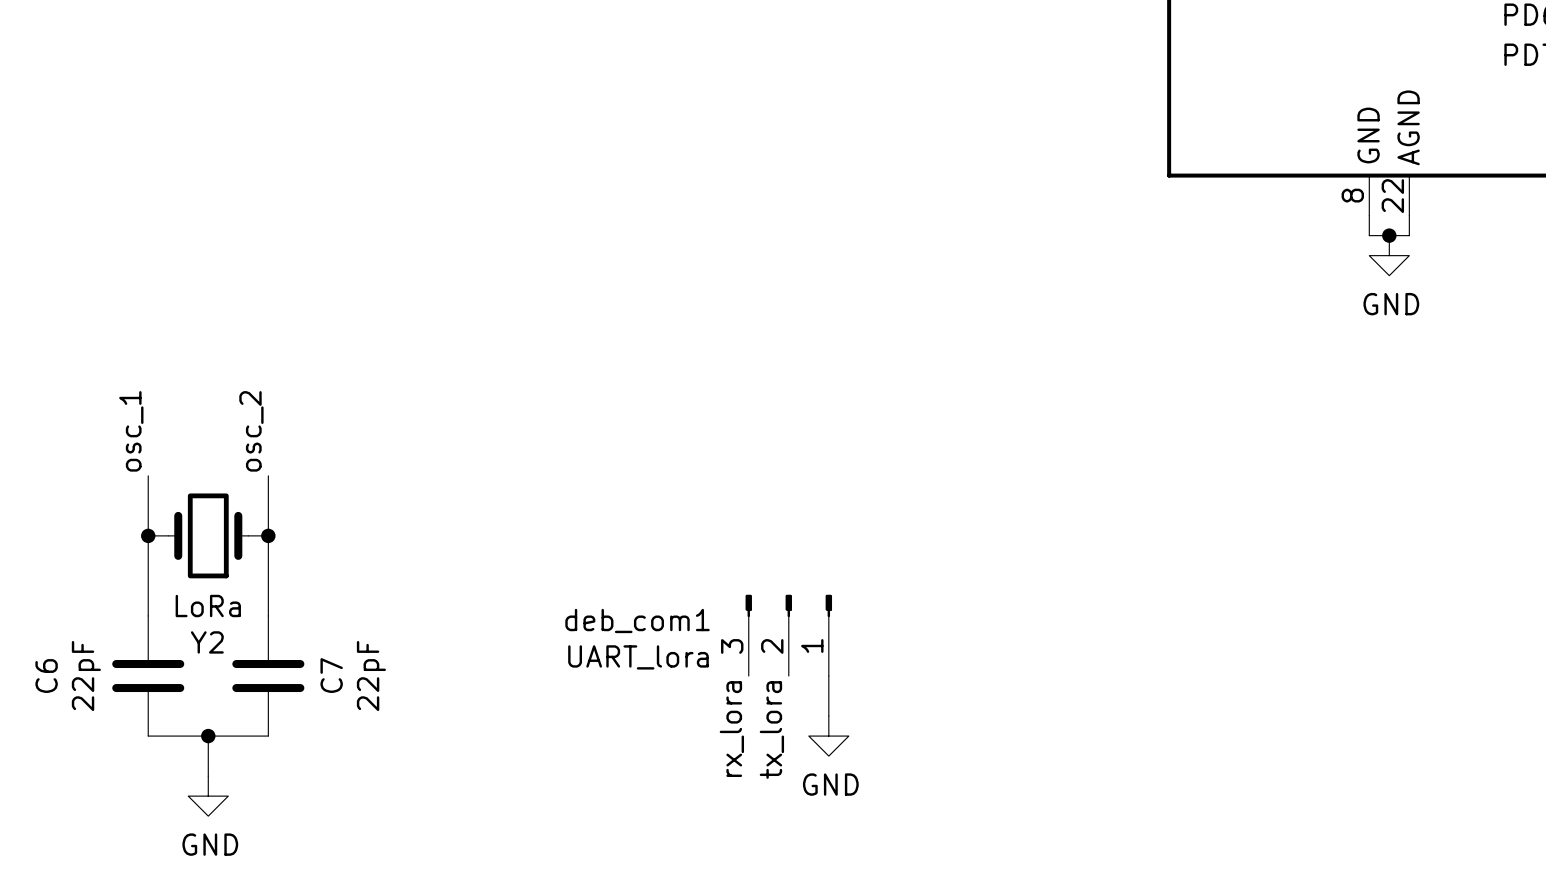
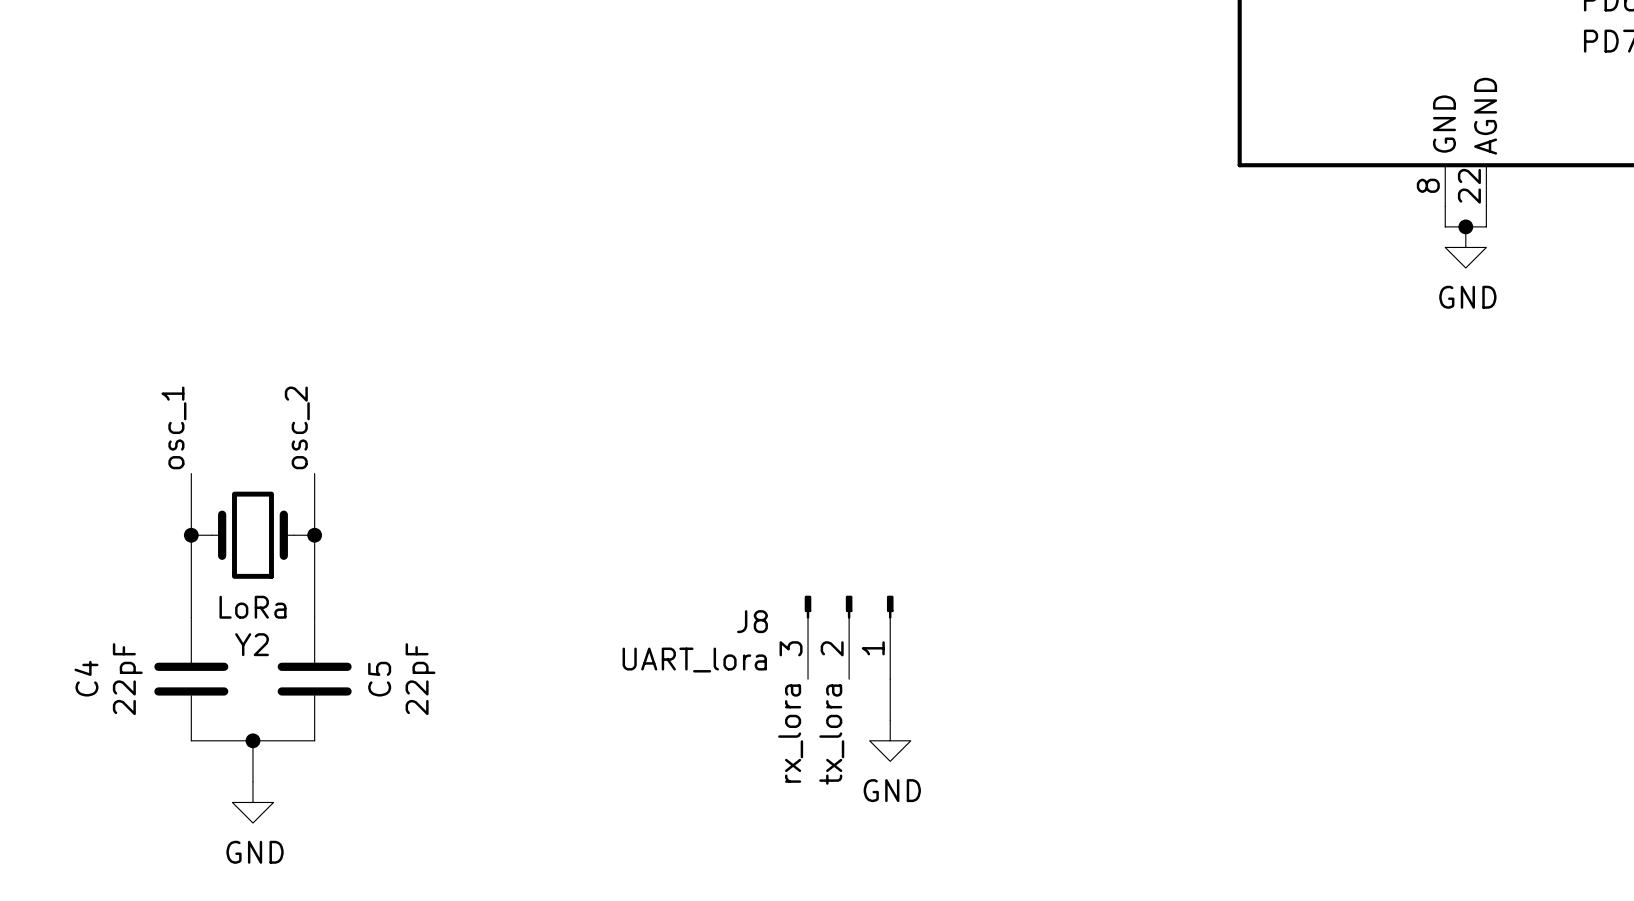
deb_com1 name: deb_com1 (637, 620) -> J8 (752, 621)
C7 name: C7 (331, 675) -> C5 (379, 679)
C6 name: C6 (46, 676) -> C4 (86, 678)

